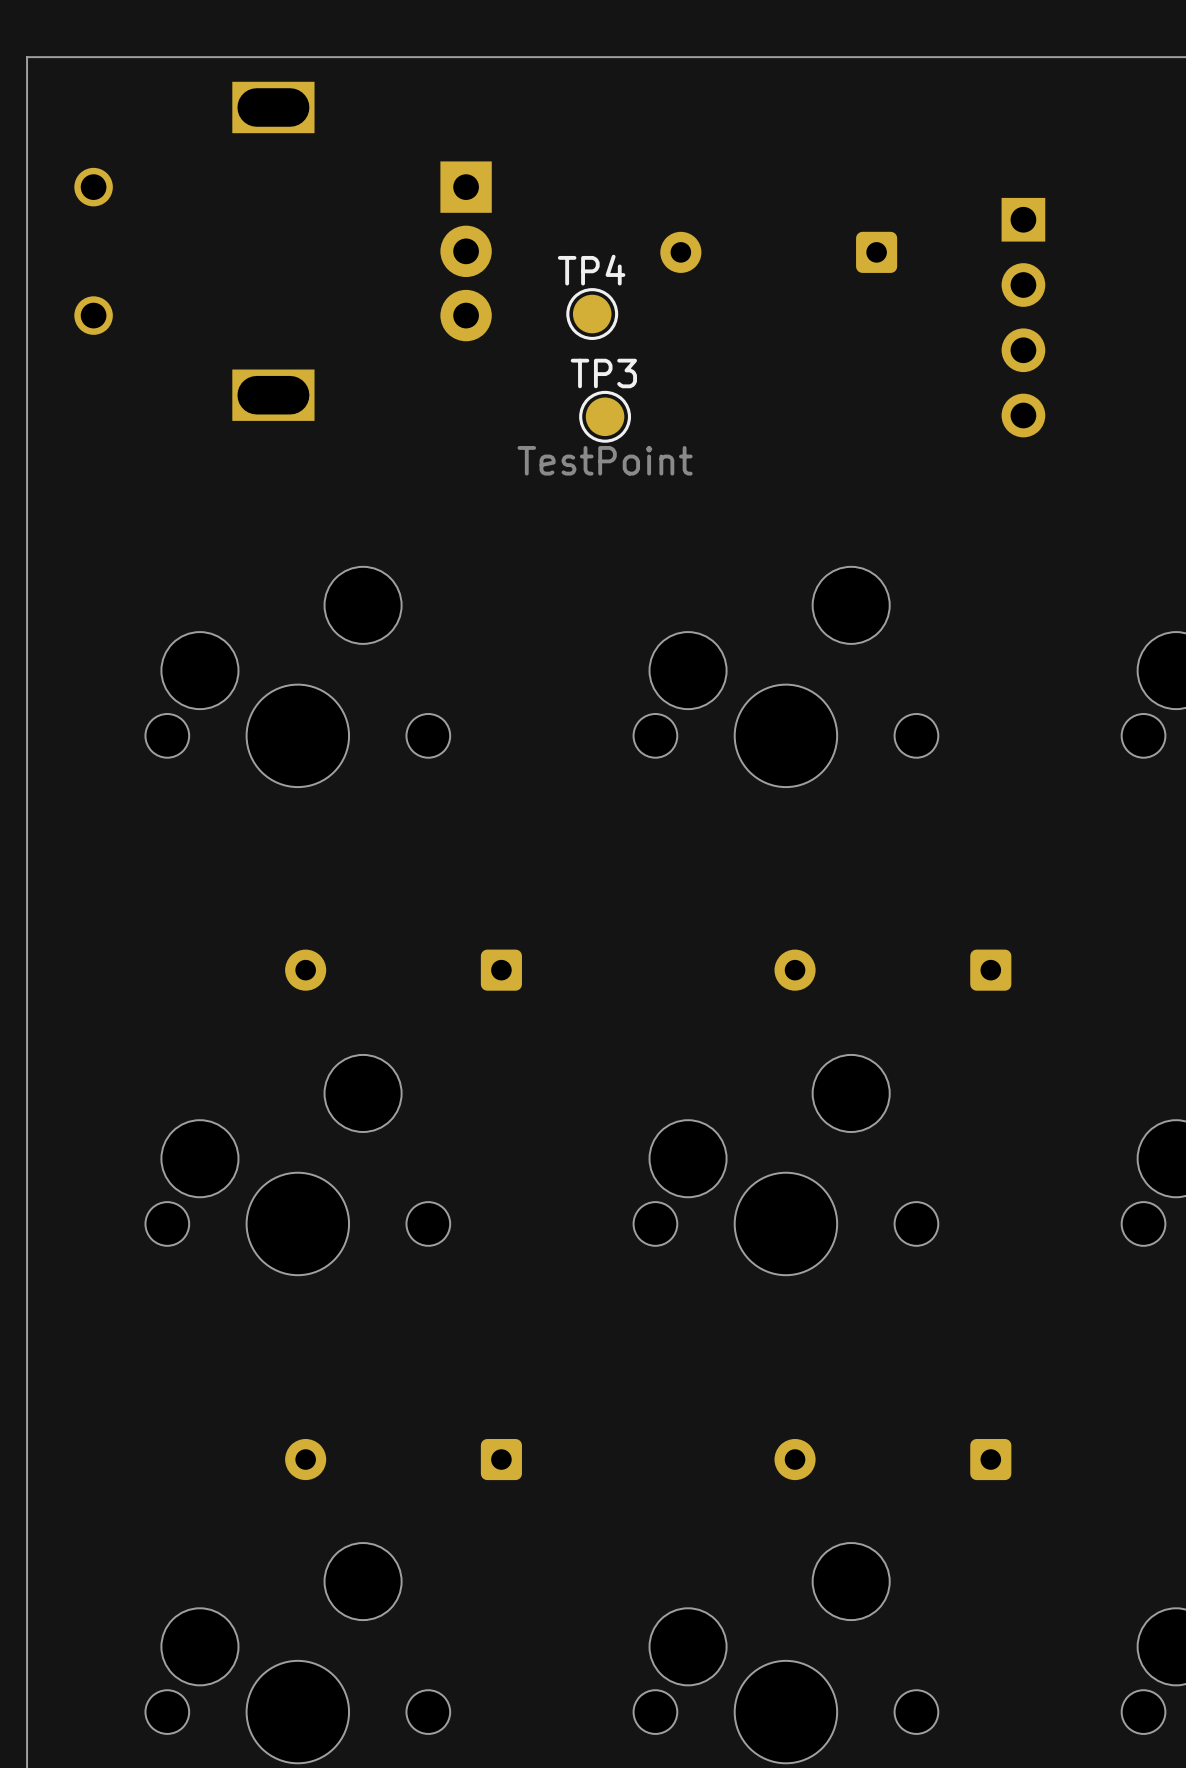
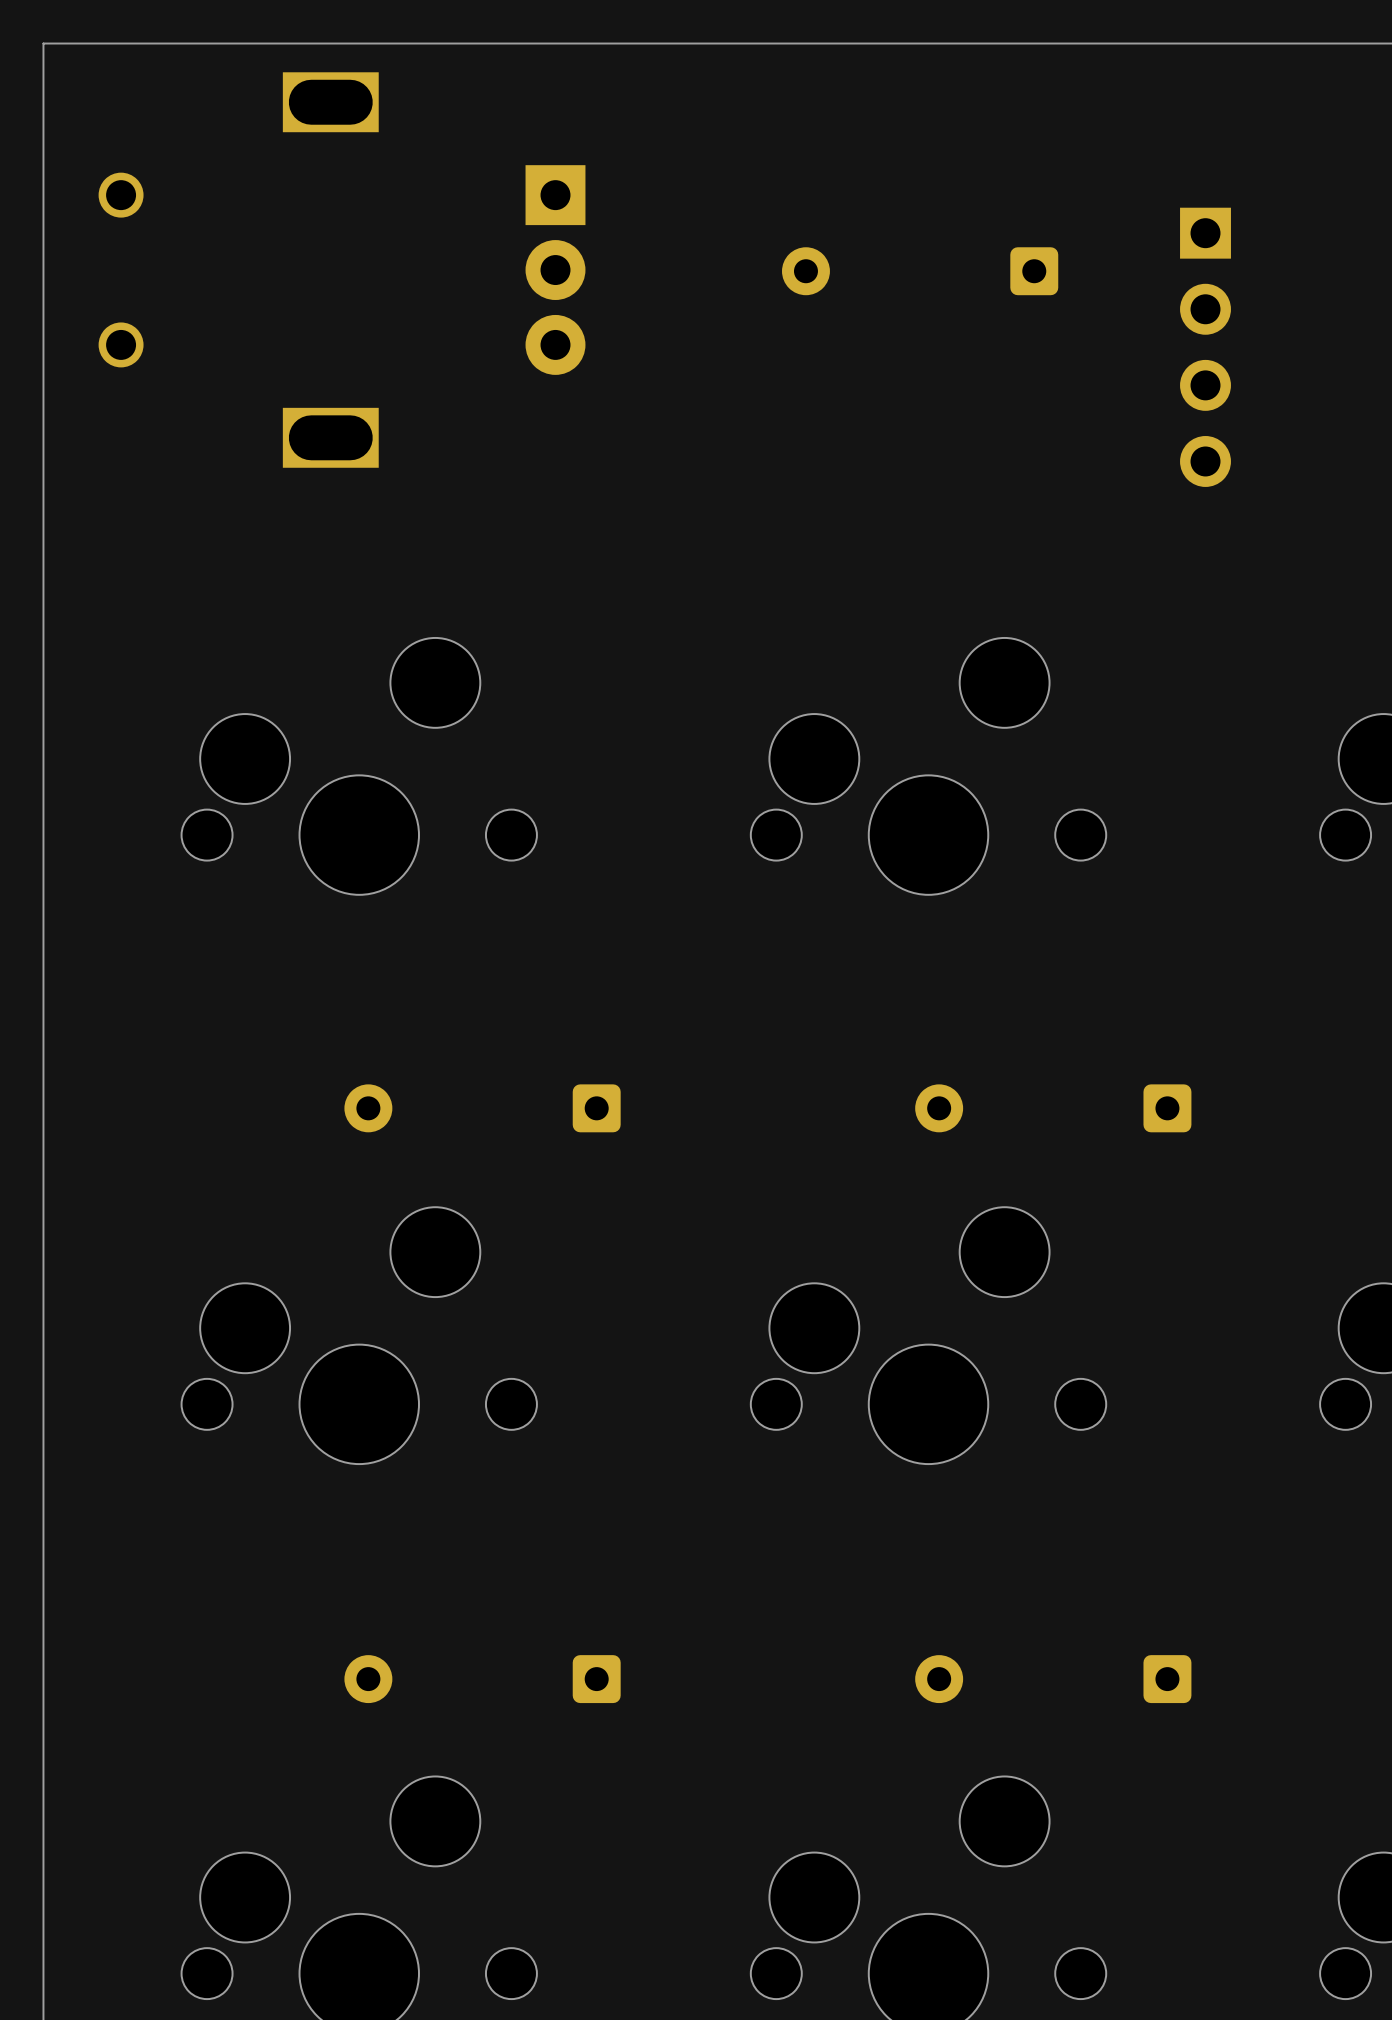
TP4: (592, 314) -> none
TP3: TestPoint (605, 416) -> none

